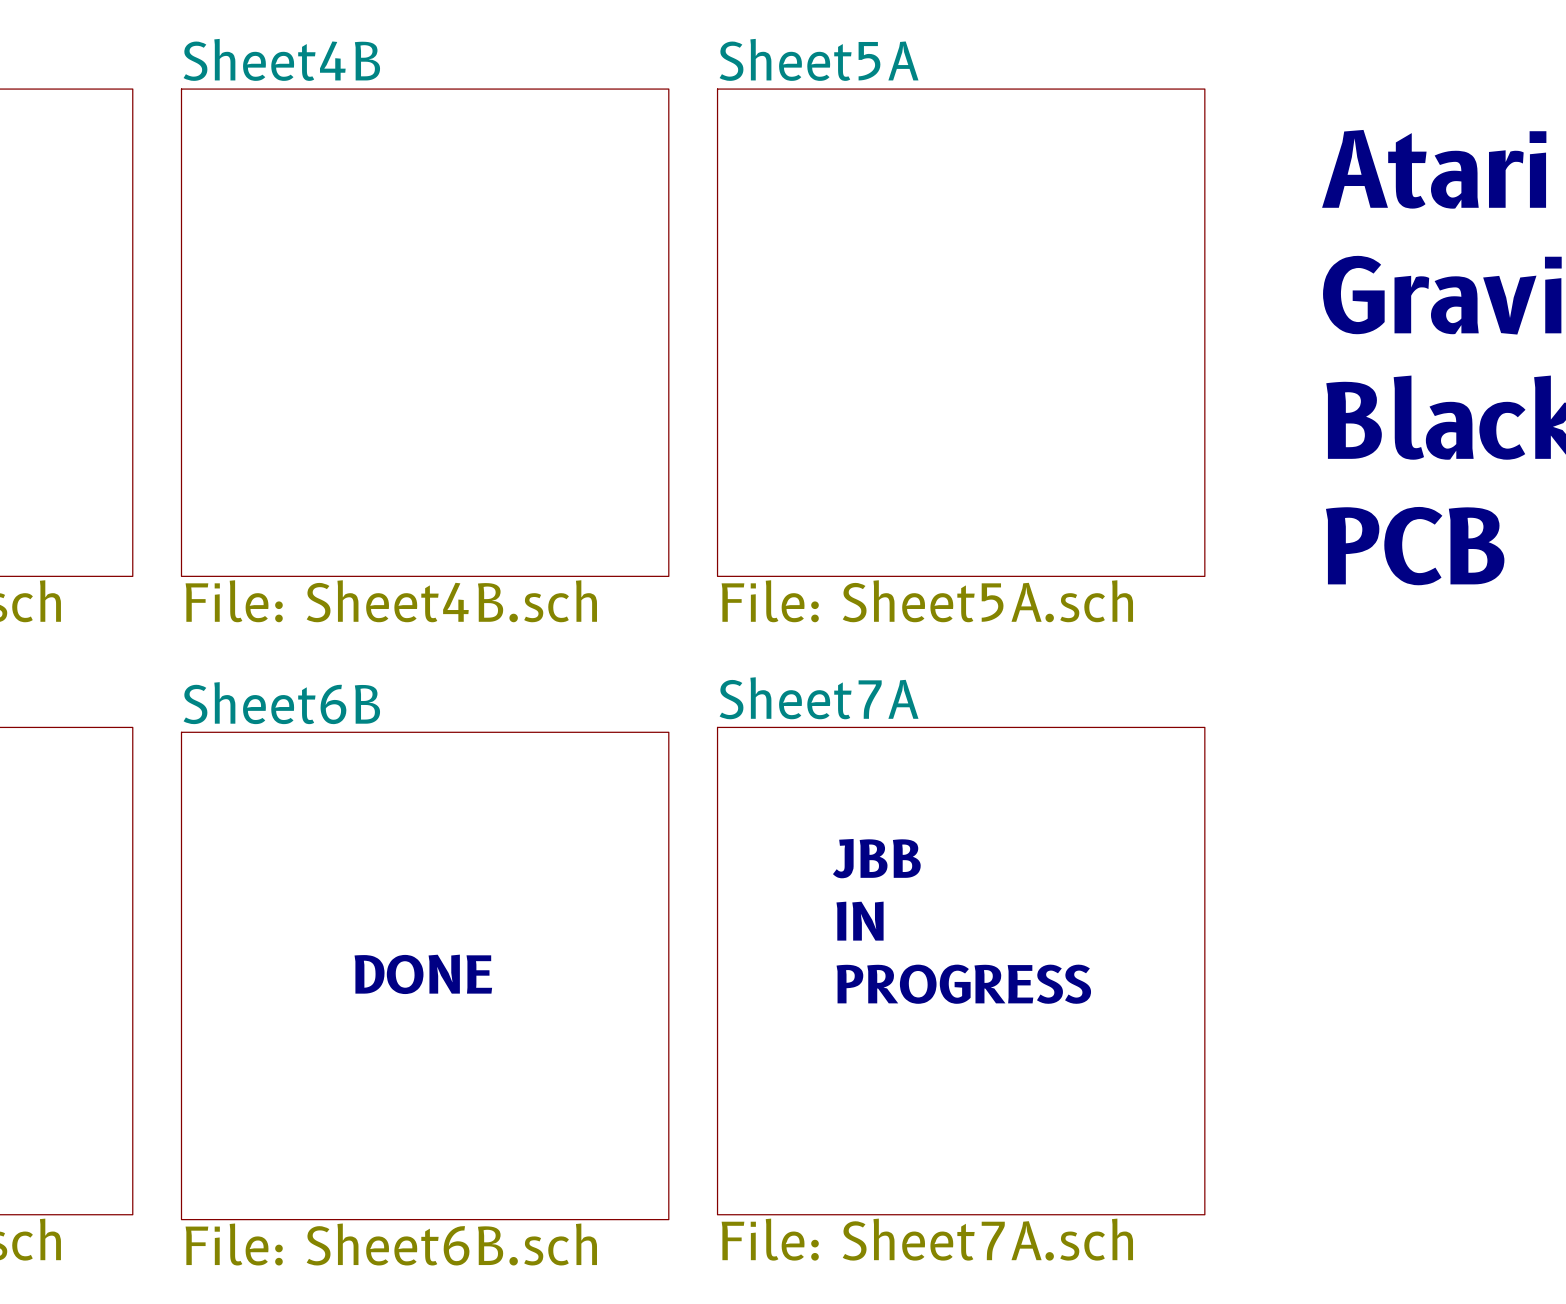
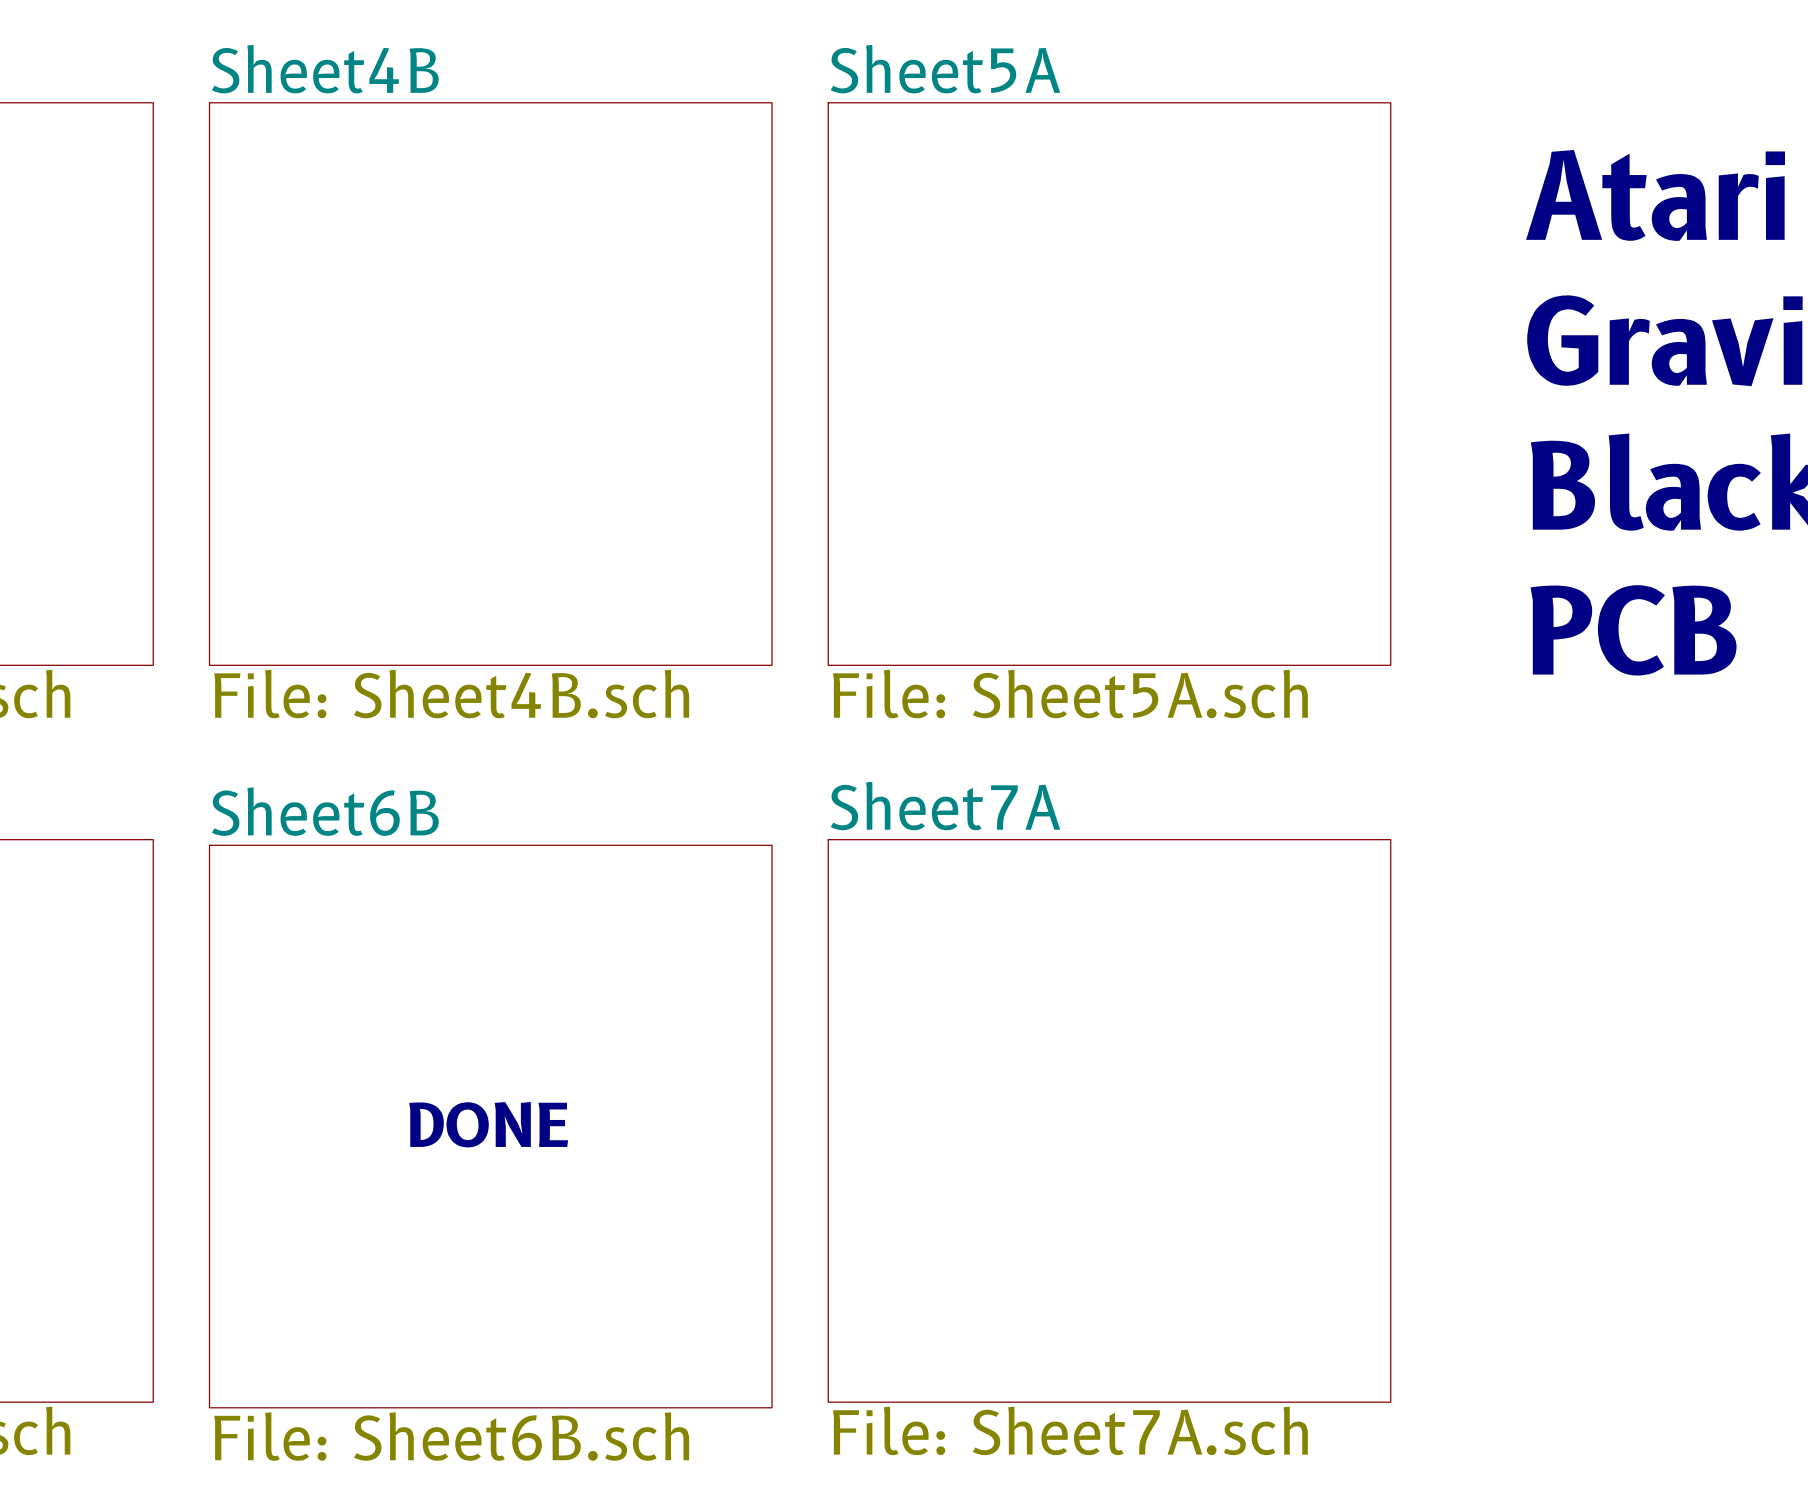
text: JBB (876, 858) -> none
text: IN (860, 921) -> none
text: PROGRESS (963, 984) -> none

